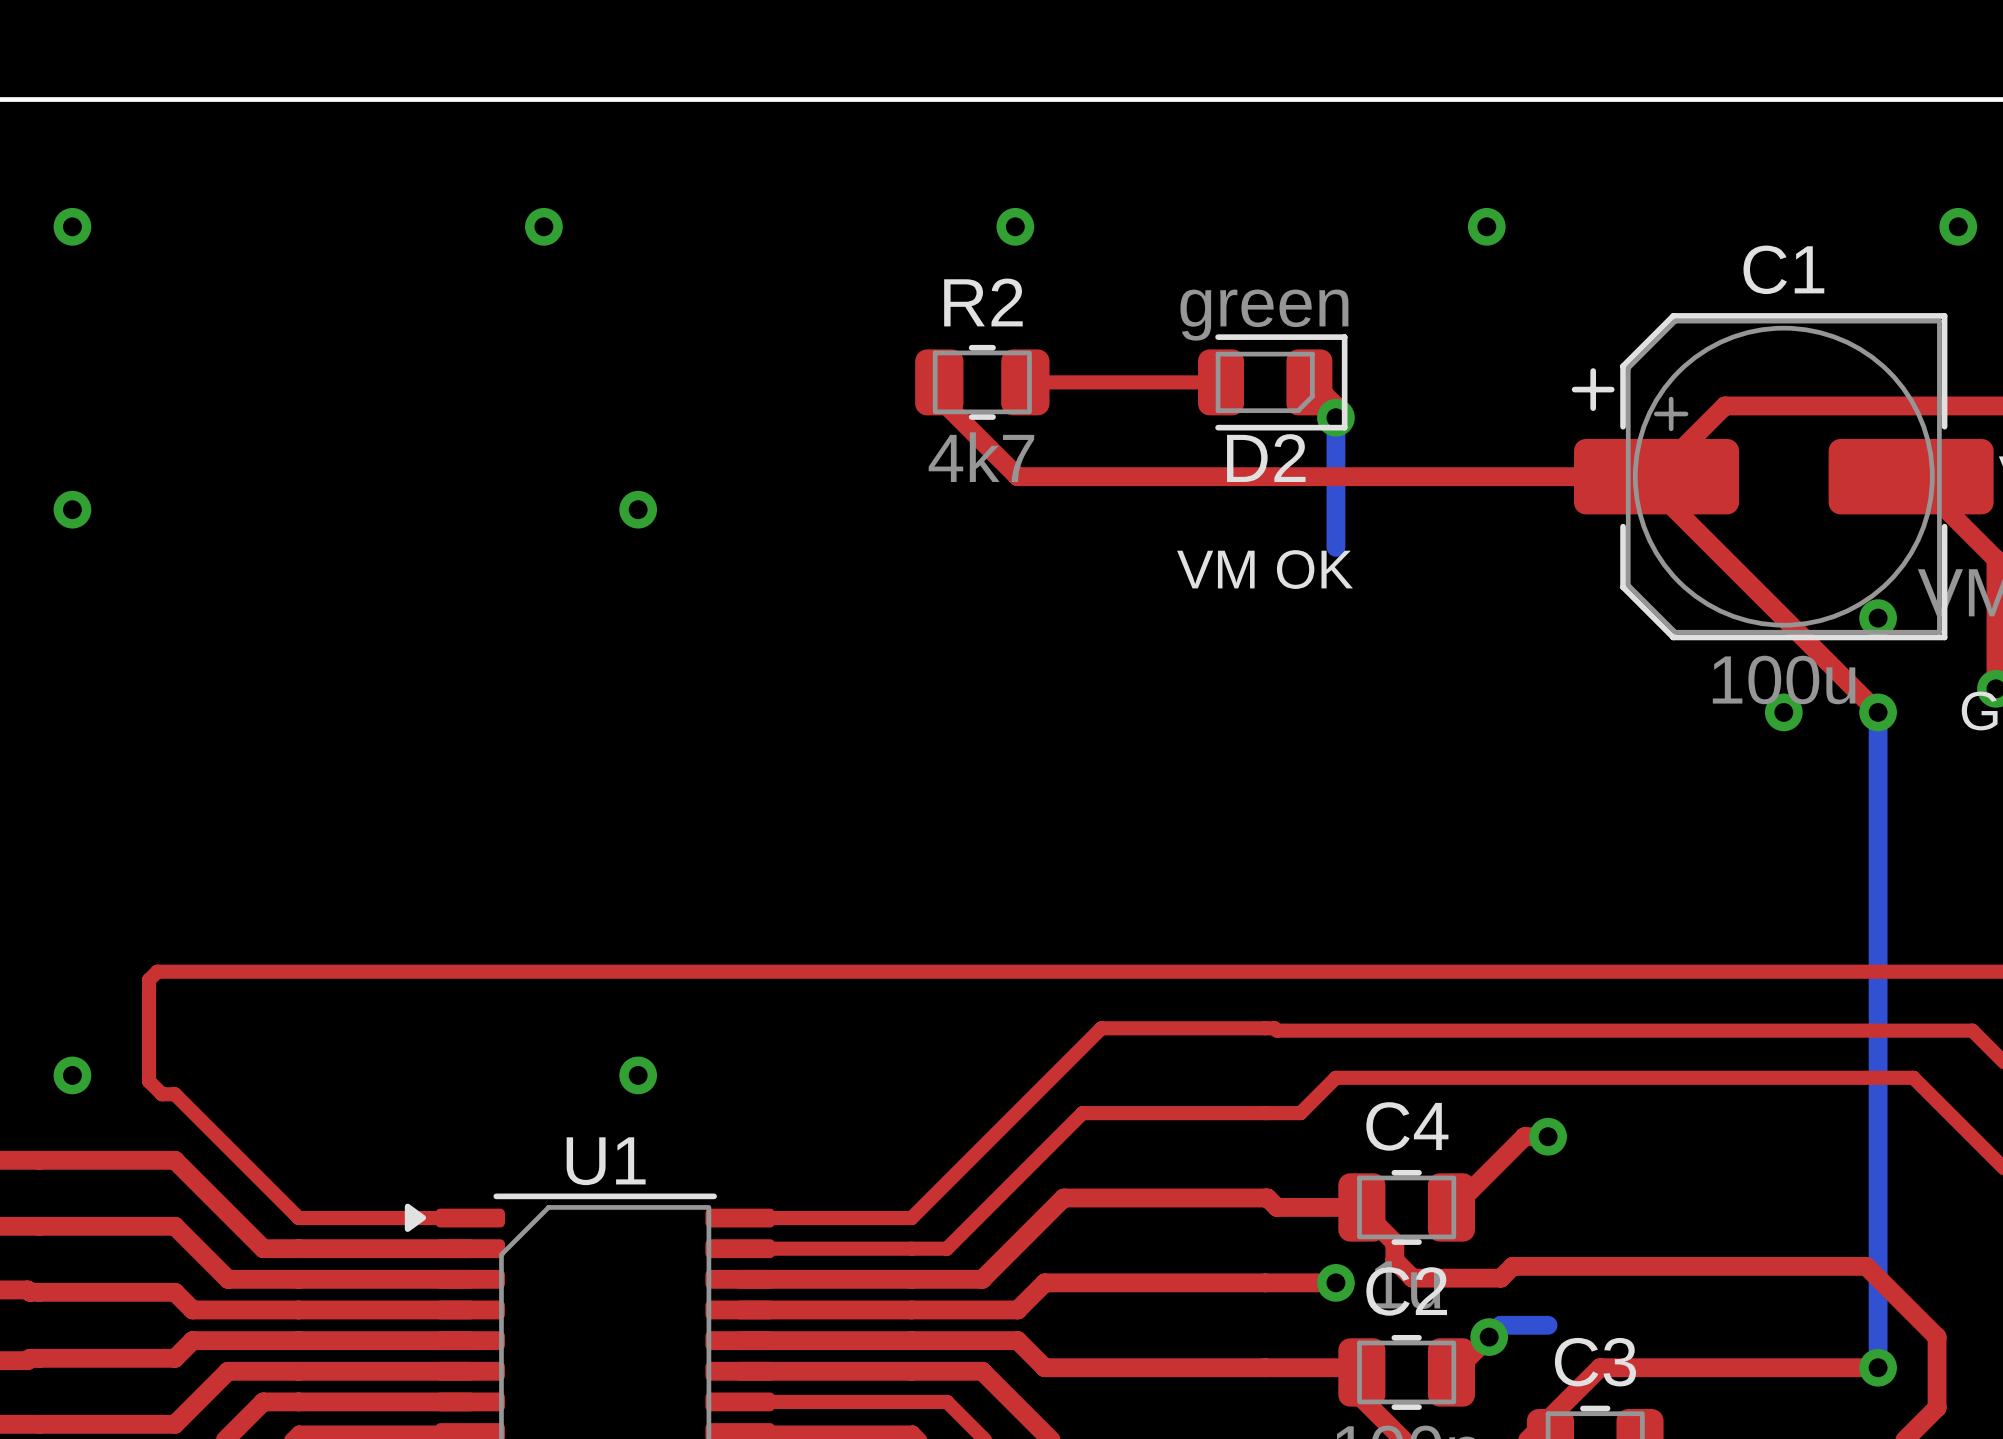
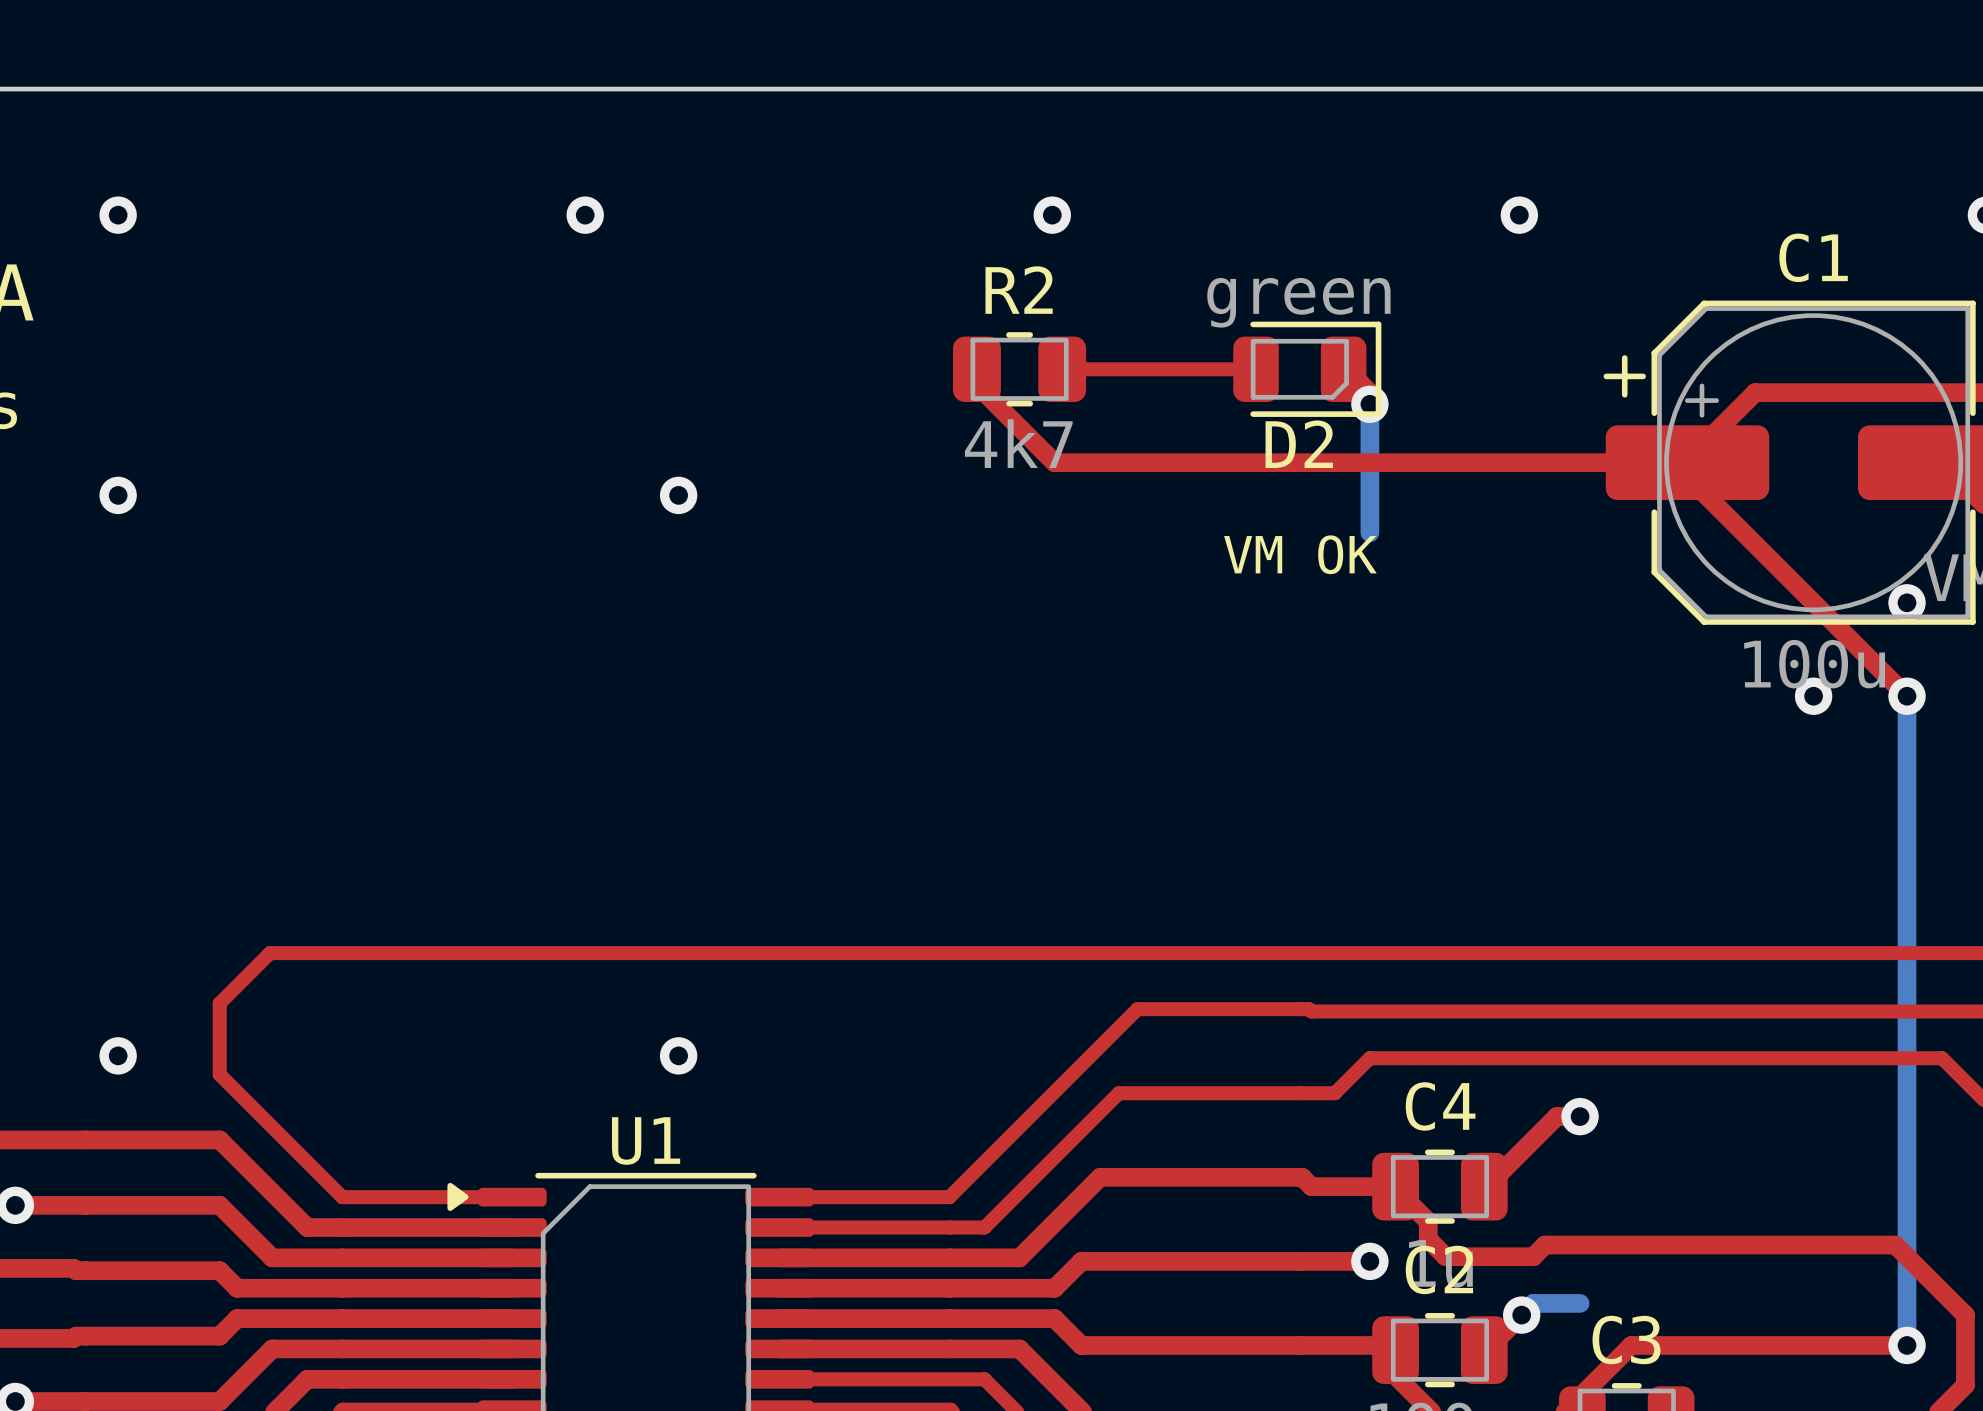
top track: (225, 971) (157, 971) (149, 979) (149, 1081) (162, 1094) (174, 1094) -> (270, 953) (219, 1003) (219, 1074)

